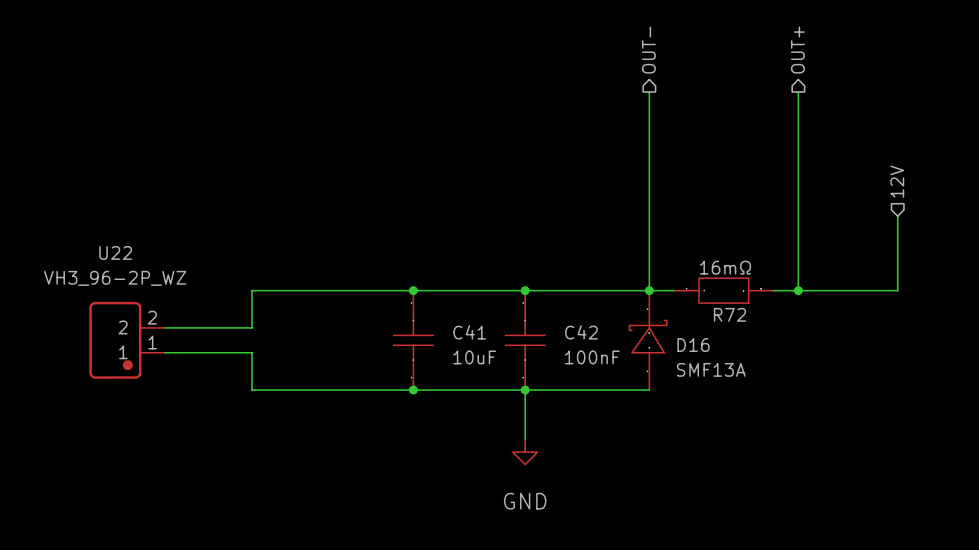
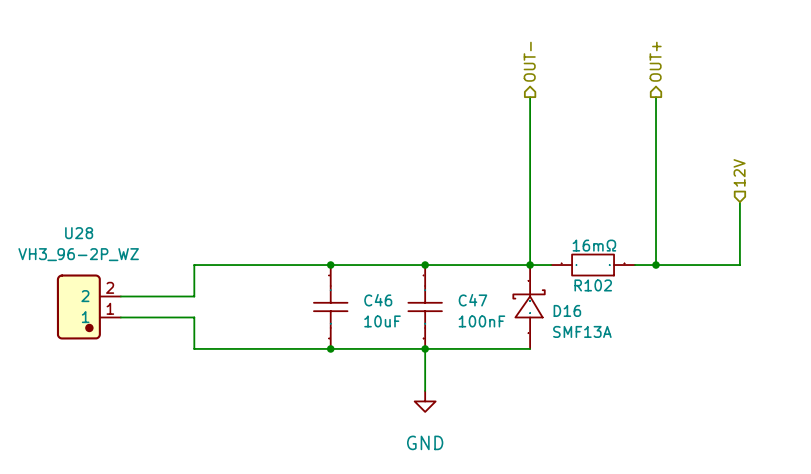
U22 name: U22 (115, 252) -> U28 (79, 233)
R72 name: R72 (729, 314) -> R102 (593, 285)
C41 name: C41 (469, 332) -> C46 (378, 300)
C42 name: C42 (581, 332) -> C47 (472, 300)

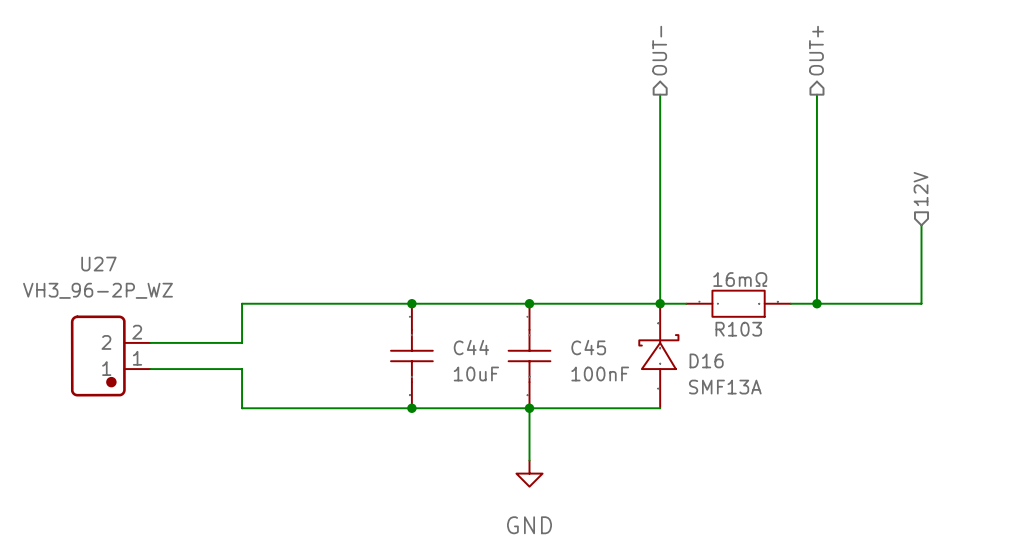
U28 name: U28 (79, 233) -> U27 (98, 264)
R102 name: R102 (593, 285) -> R103 (738, 329)
C46 name: C46 (378, 300) -> C44 (471, 347)
C47 name: C47 (472, 300) -> C45 (588, 347)

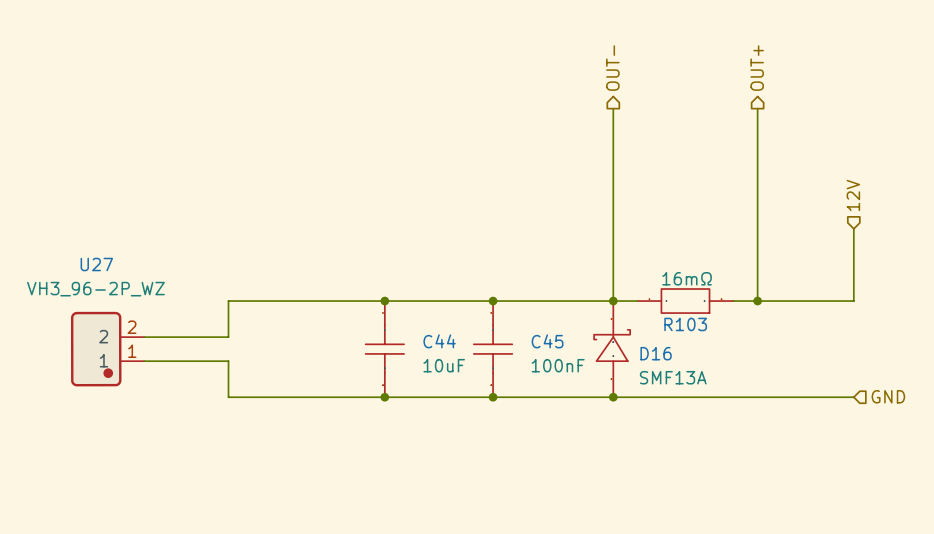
hierarchical label: none -> GND (888, 396)
wire: (529, 408) (529, 460) -> none
wire: none -> (613, 397) (853, 397)
junction: none -> (613, 397)
power symbol: GND (529, 473) -> none

